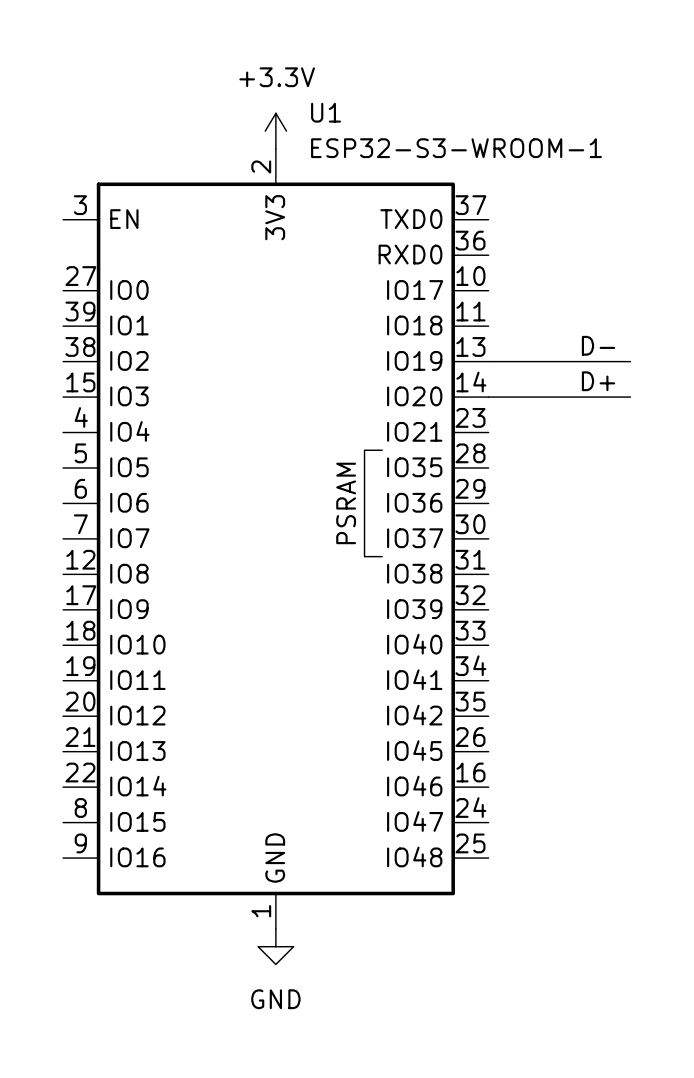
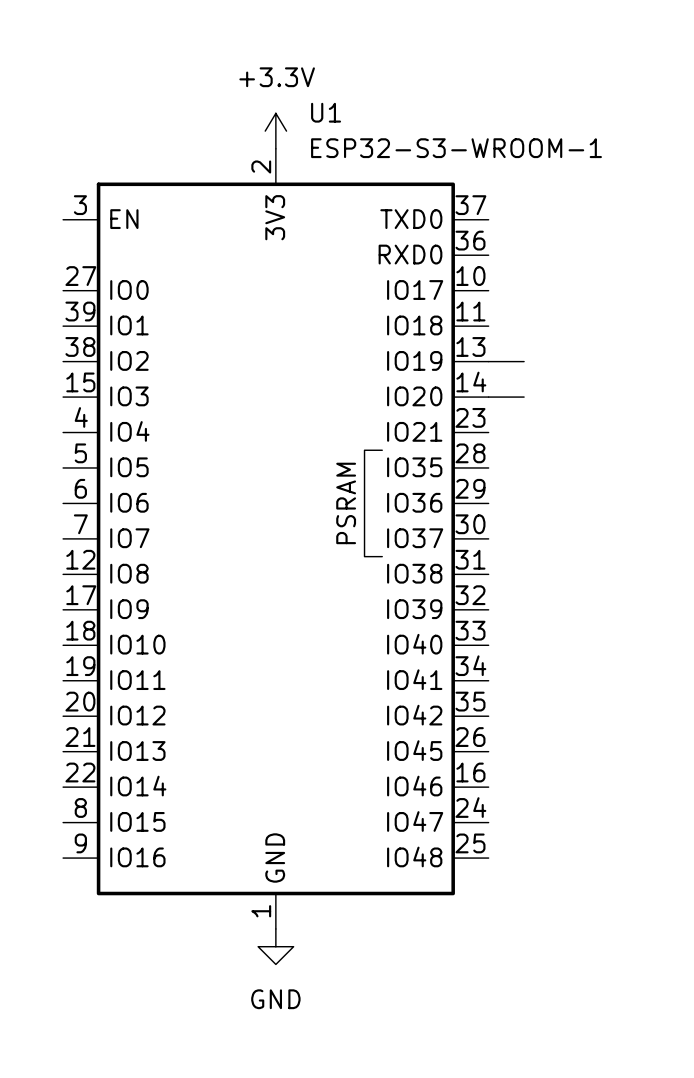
label: D- (598, 345) -> none
wire: (524, 361) (630, 361) -> none
label: D+ (598, 381) -> none
wire: (524, 397) (630, 397) -> none

